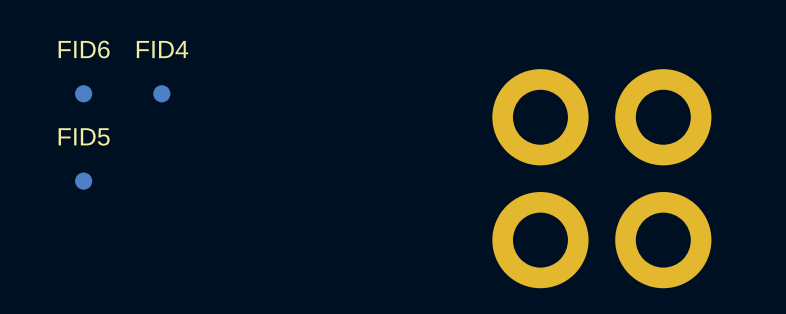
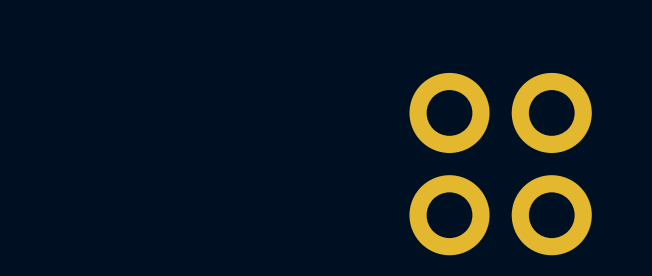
FID6: (83, 93) -> none
FID4: (161, 93) -> none
FID5: (83, 181) -> none

